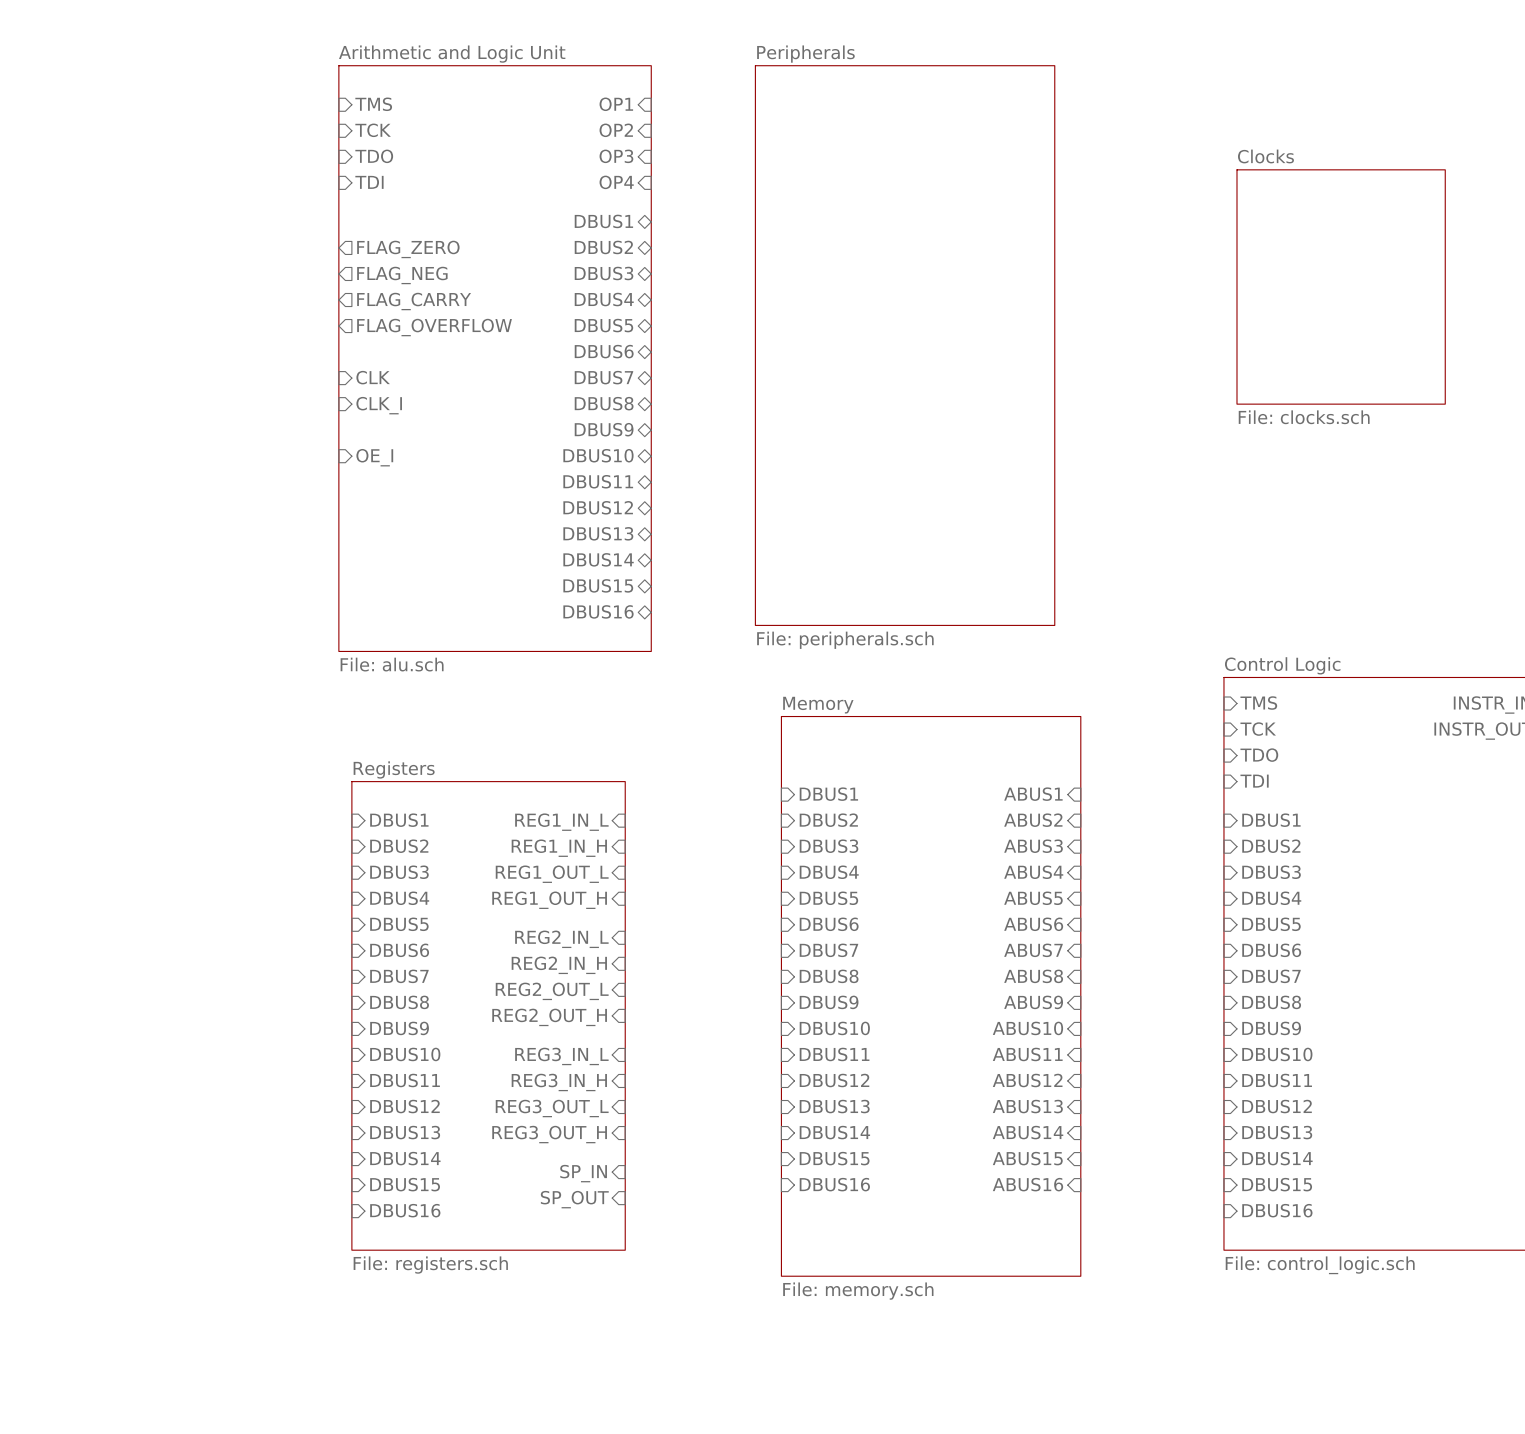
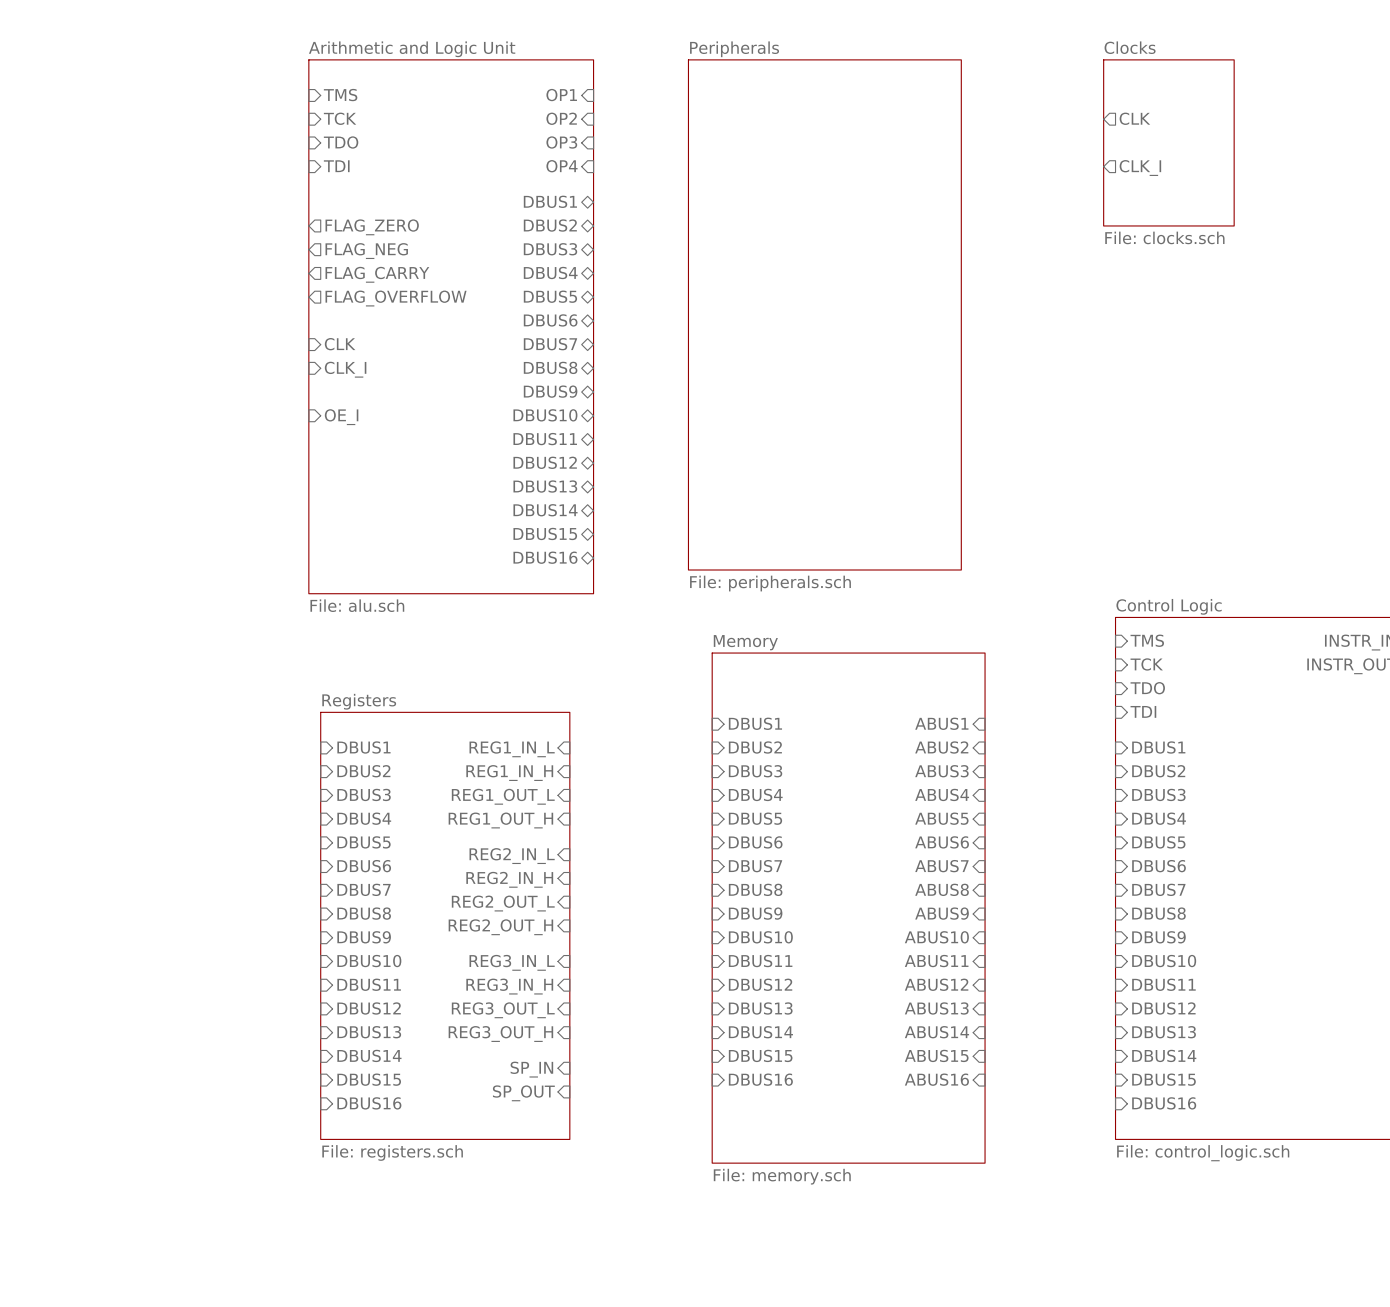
sheet pin: none -> CLK (1134, 118)
sheet Clocks: none -> File: clocks.sch (1168, 142)
sheet pin: none -> CLK_I (1140, 168)
sheet Clocks: File: clocks.sch (1341, 286) -> none

